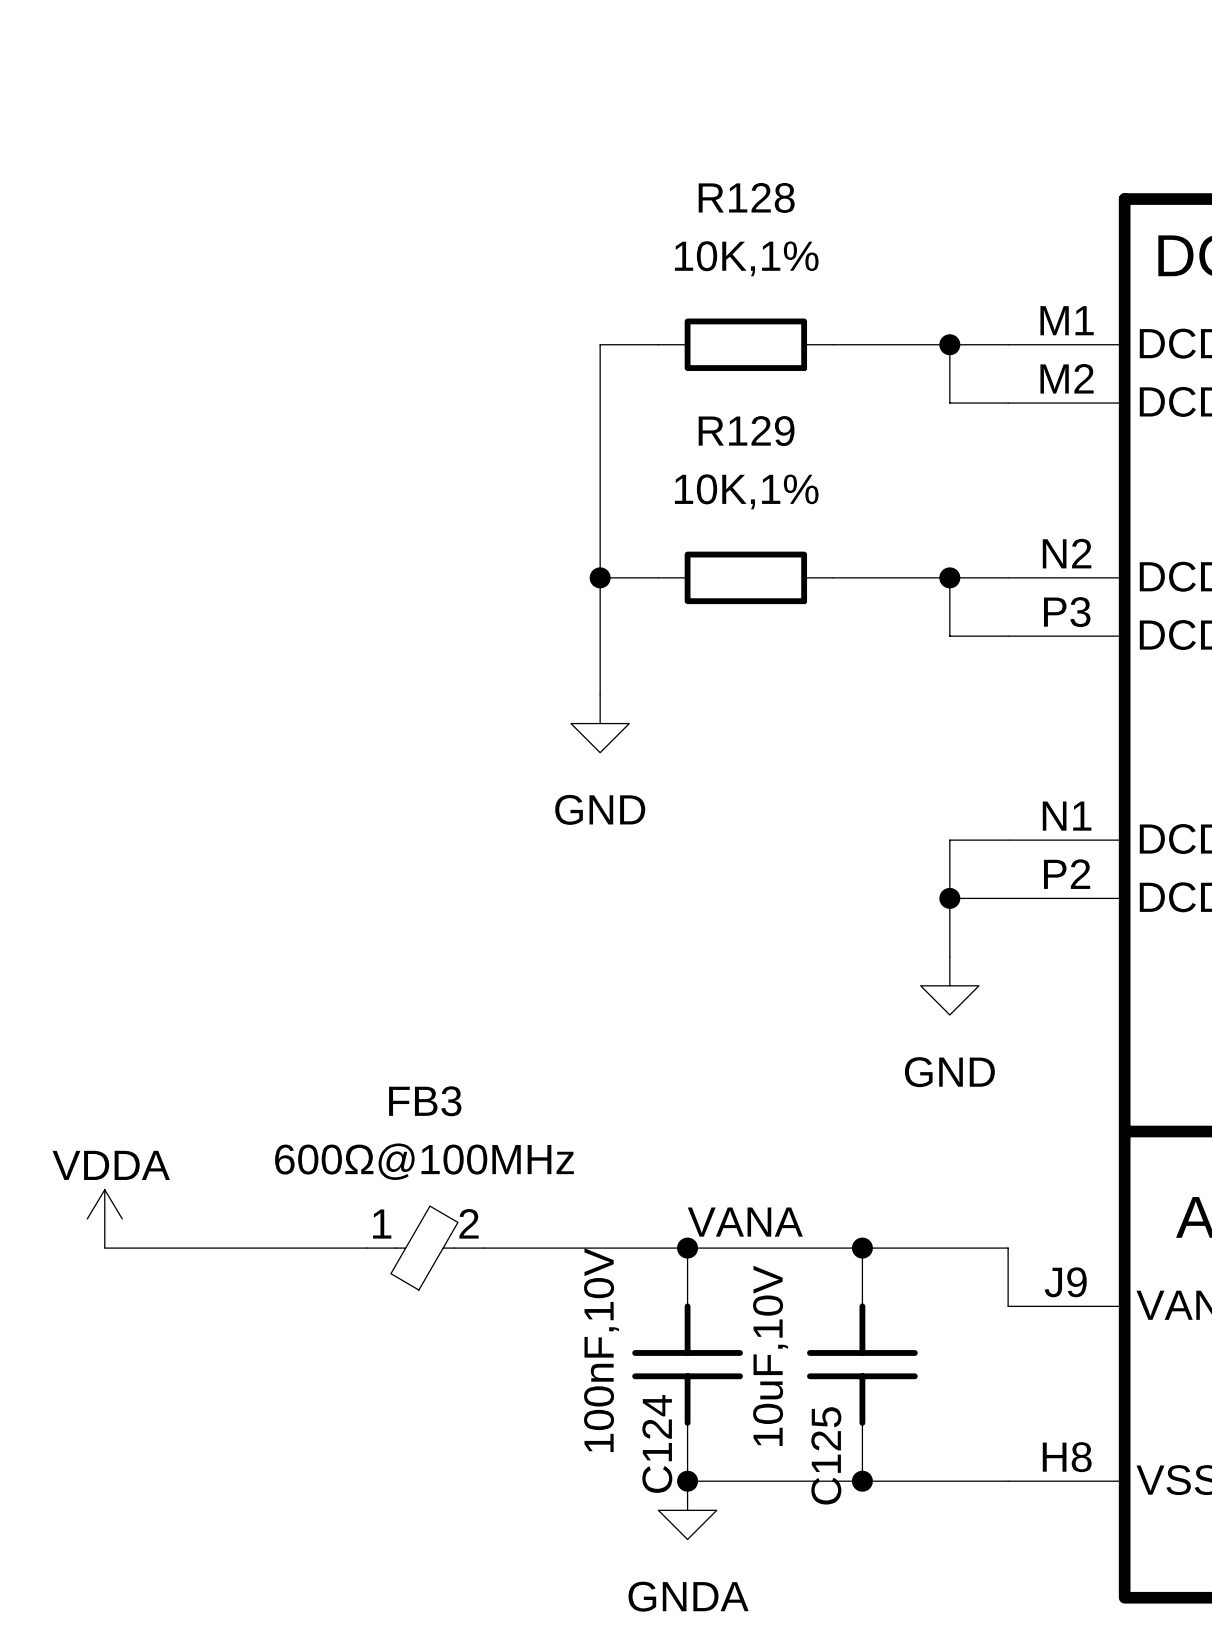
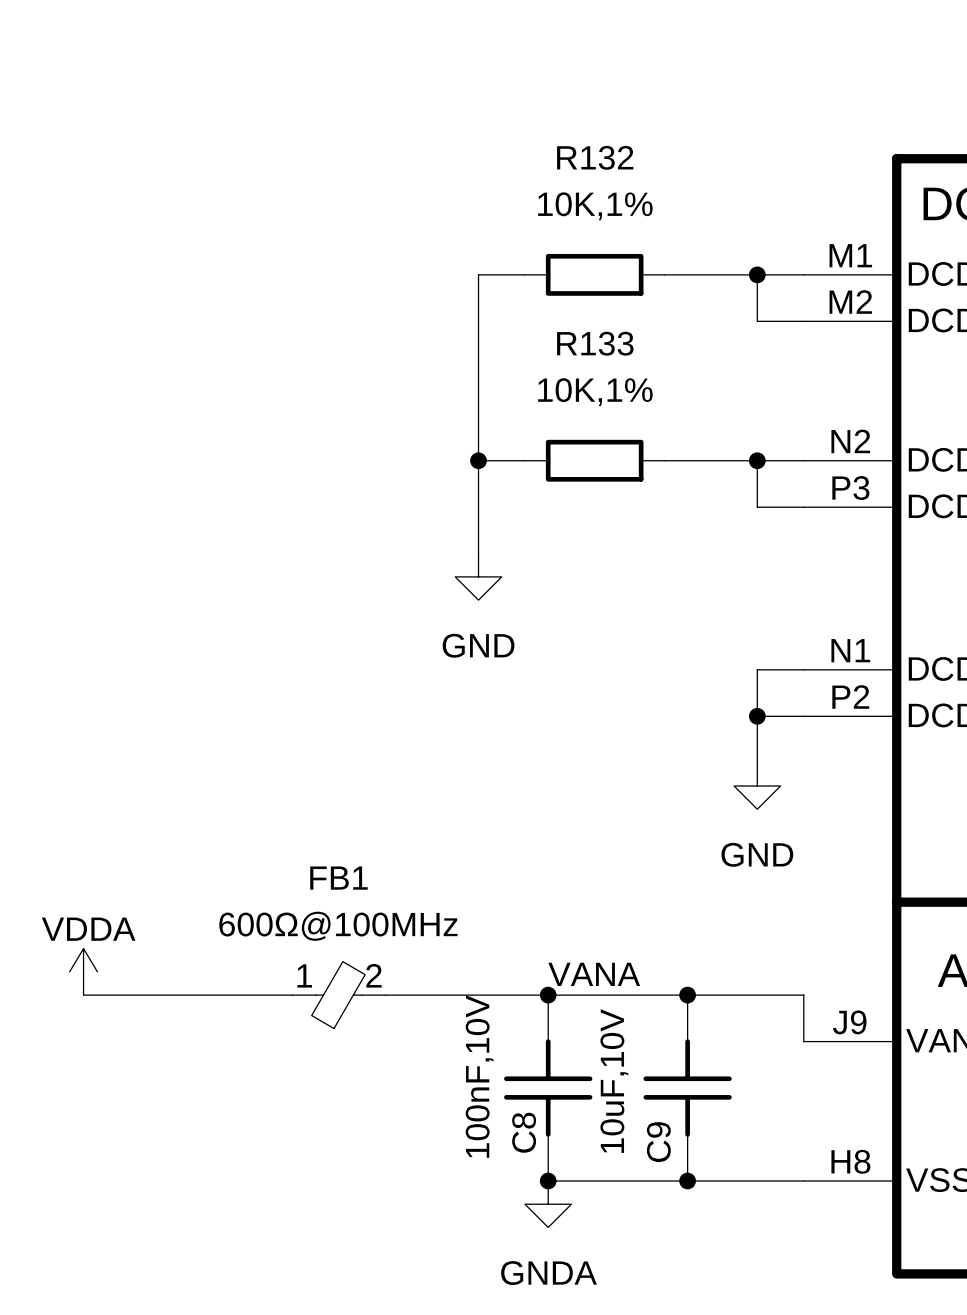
R128 name: R128 (746, 197) -> R132 (595, 157)
R129 name: R129 (746, 431) -> R133 (595, 343)
FB3 name: FB3 (425, 1101) -> FB1 (338, 878)
C124 name: C124 (657, 1443) -> C8 (524, 1132)
C125 name: C125 (826, 1455) -> C9 (658, 1142)

